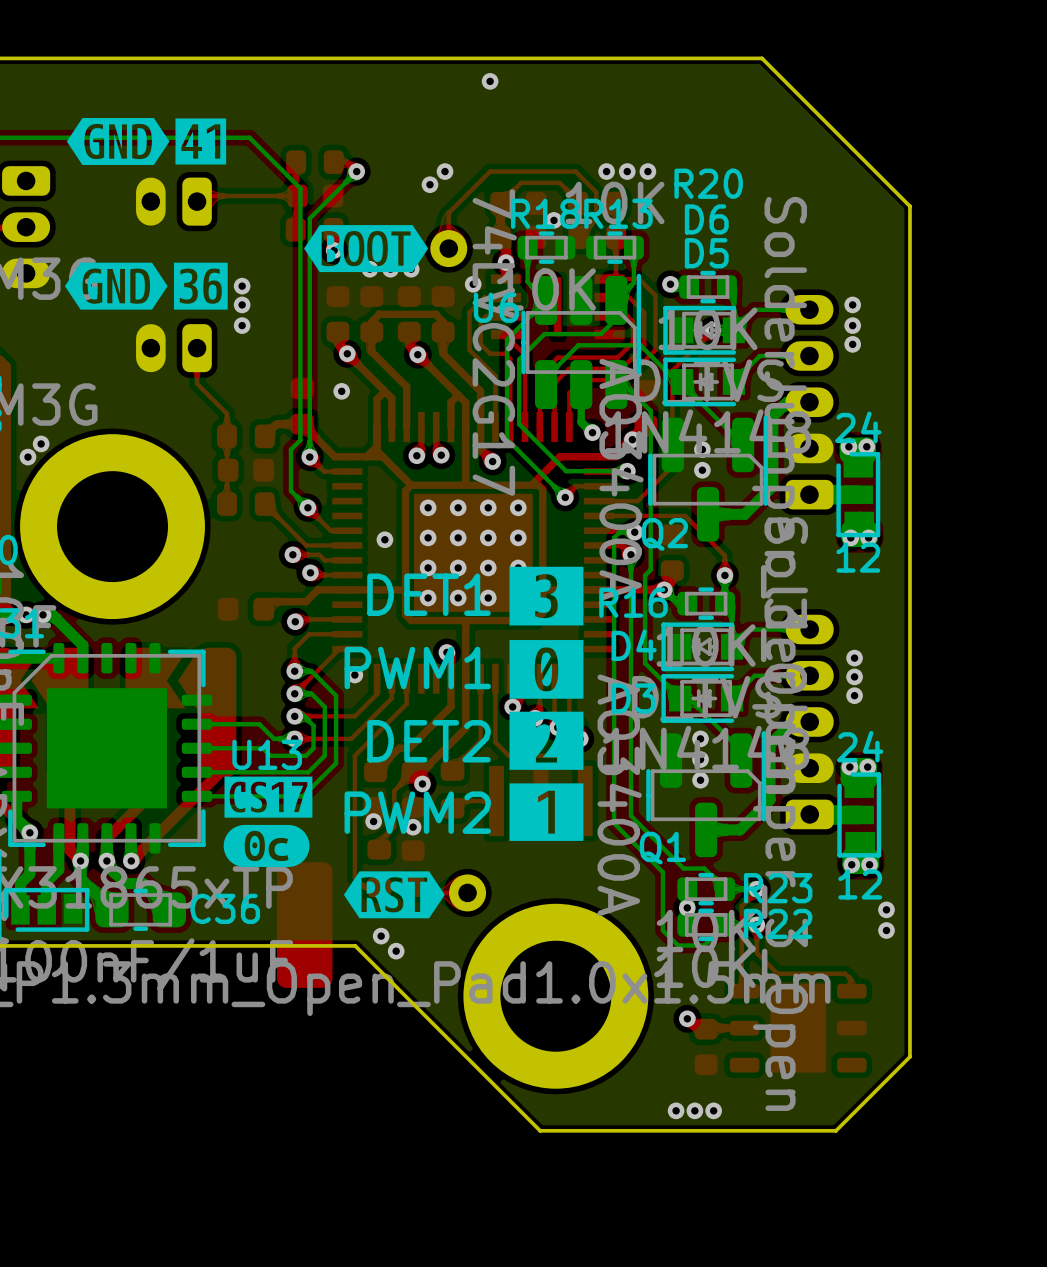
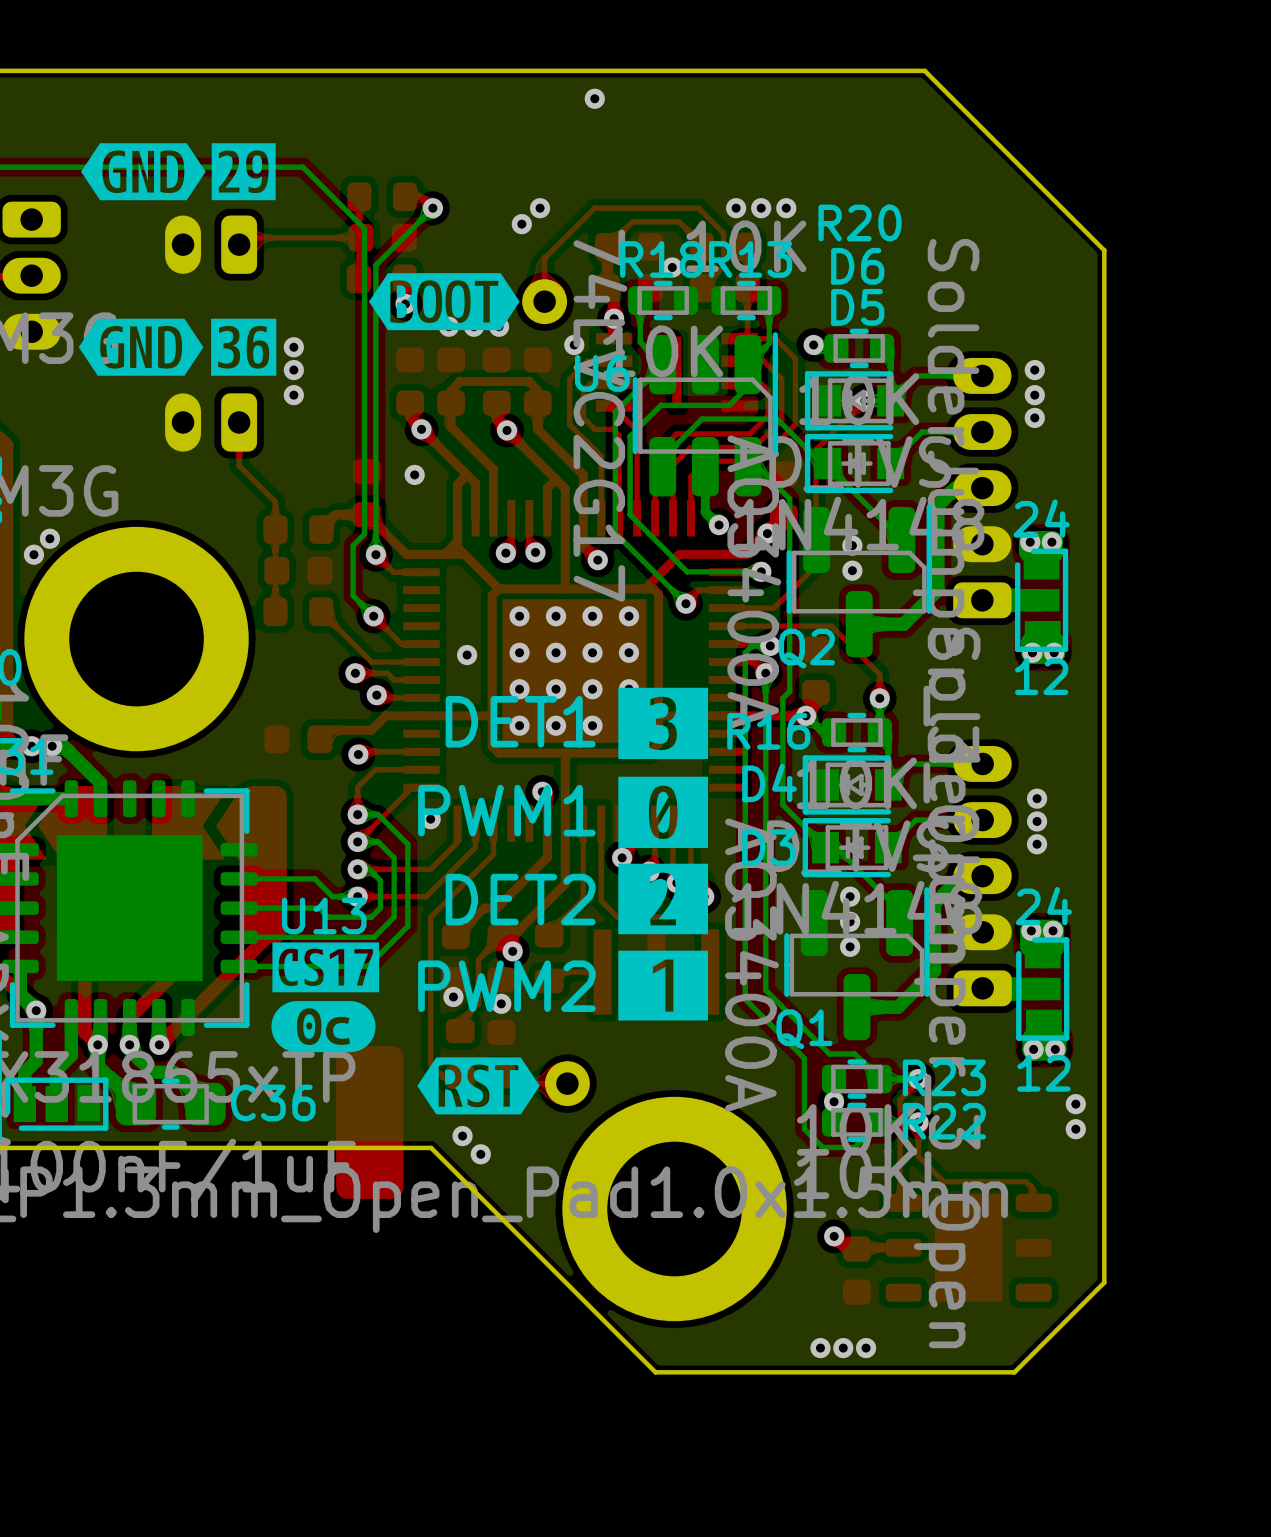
drawing shape: [175, 118, 227, 165] -> [211, 143, 276, 201]

